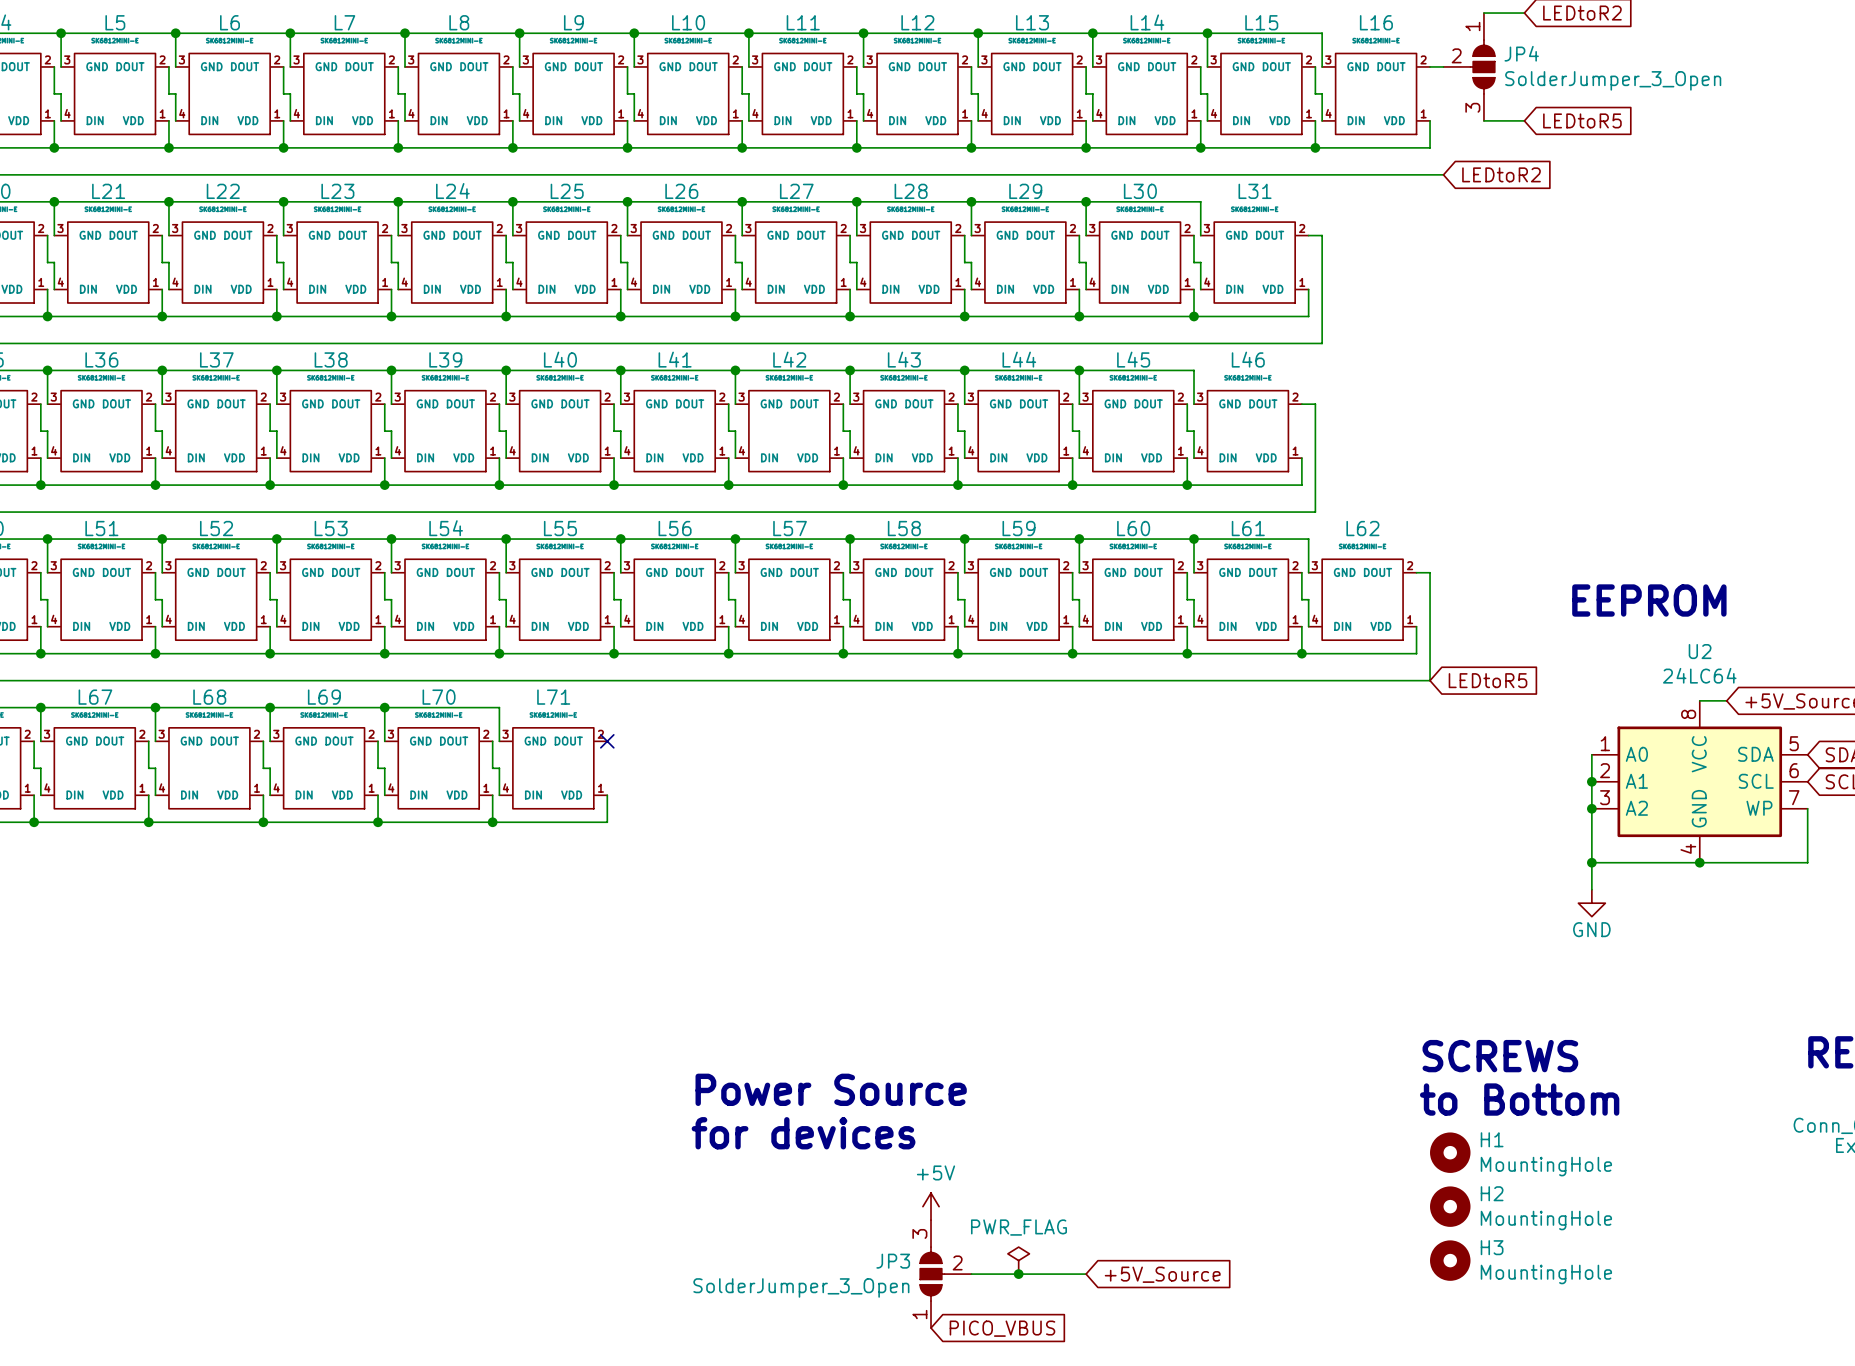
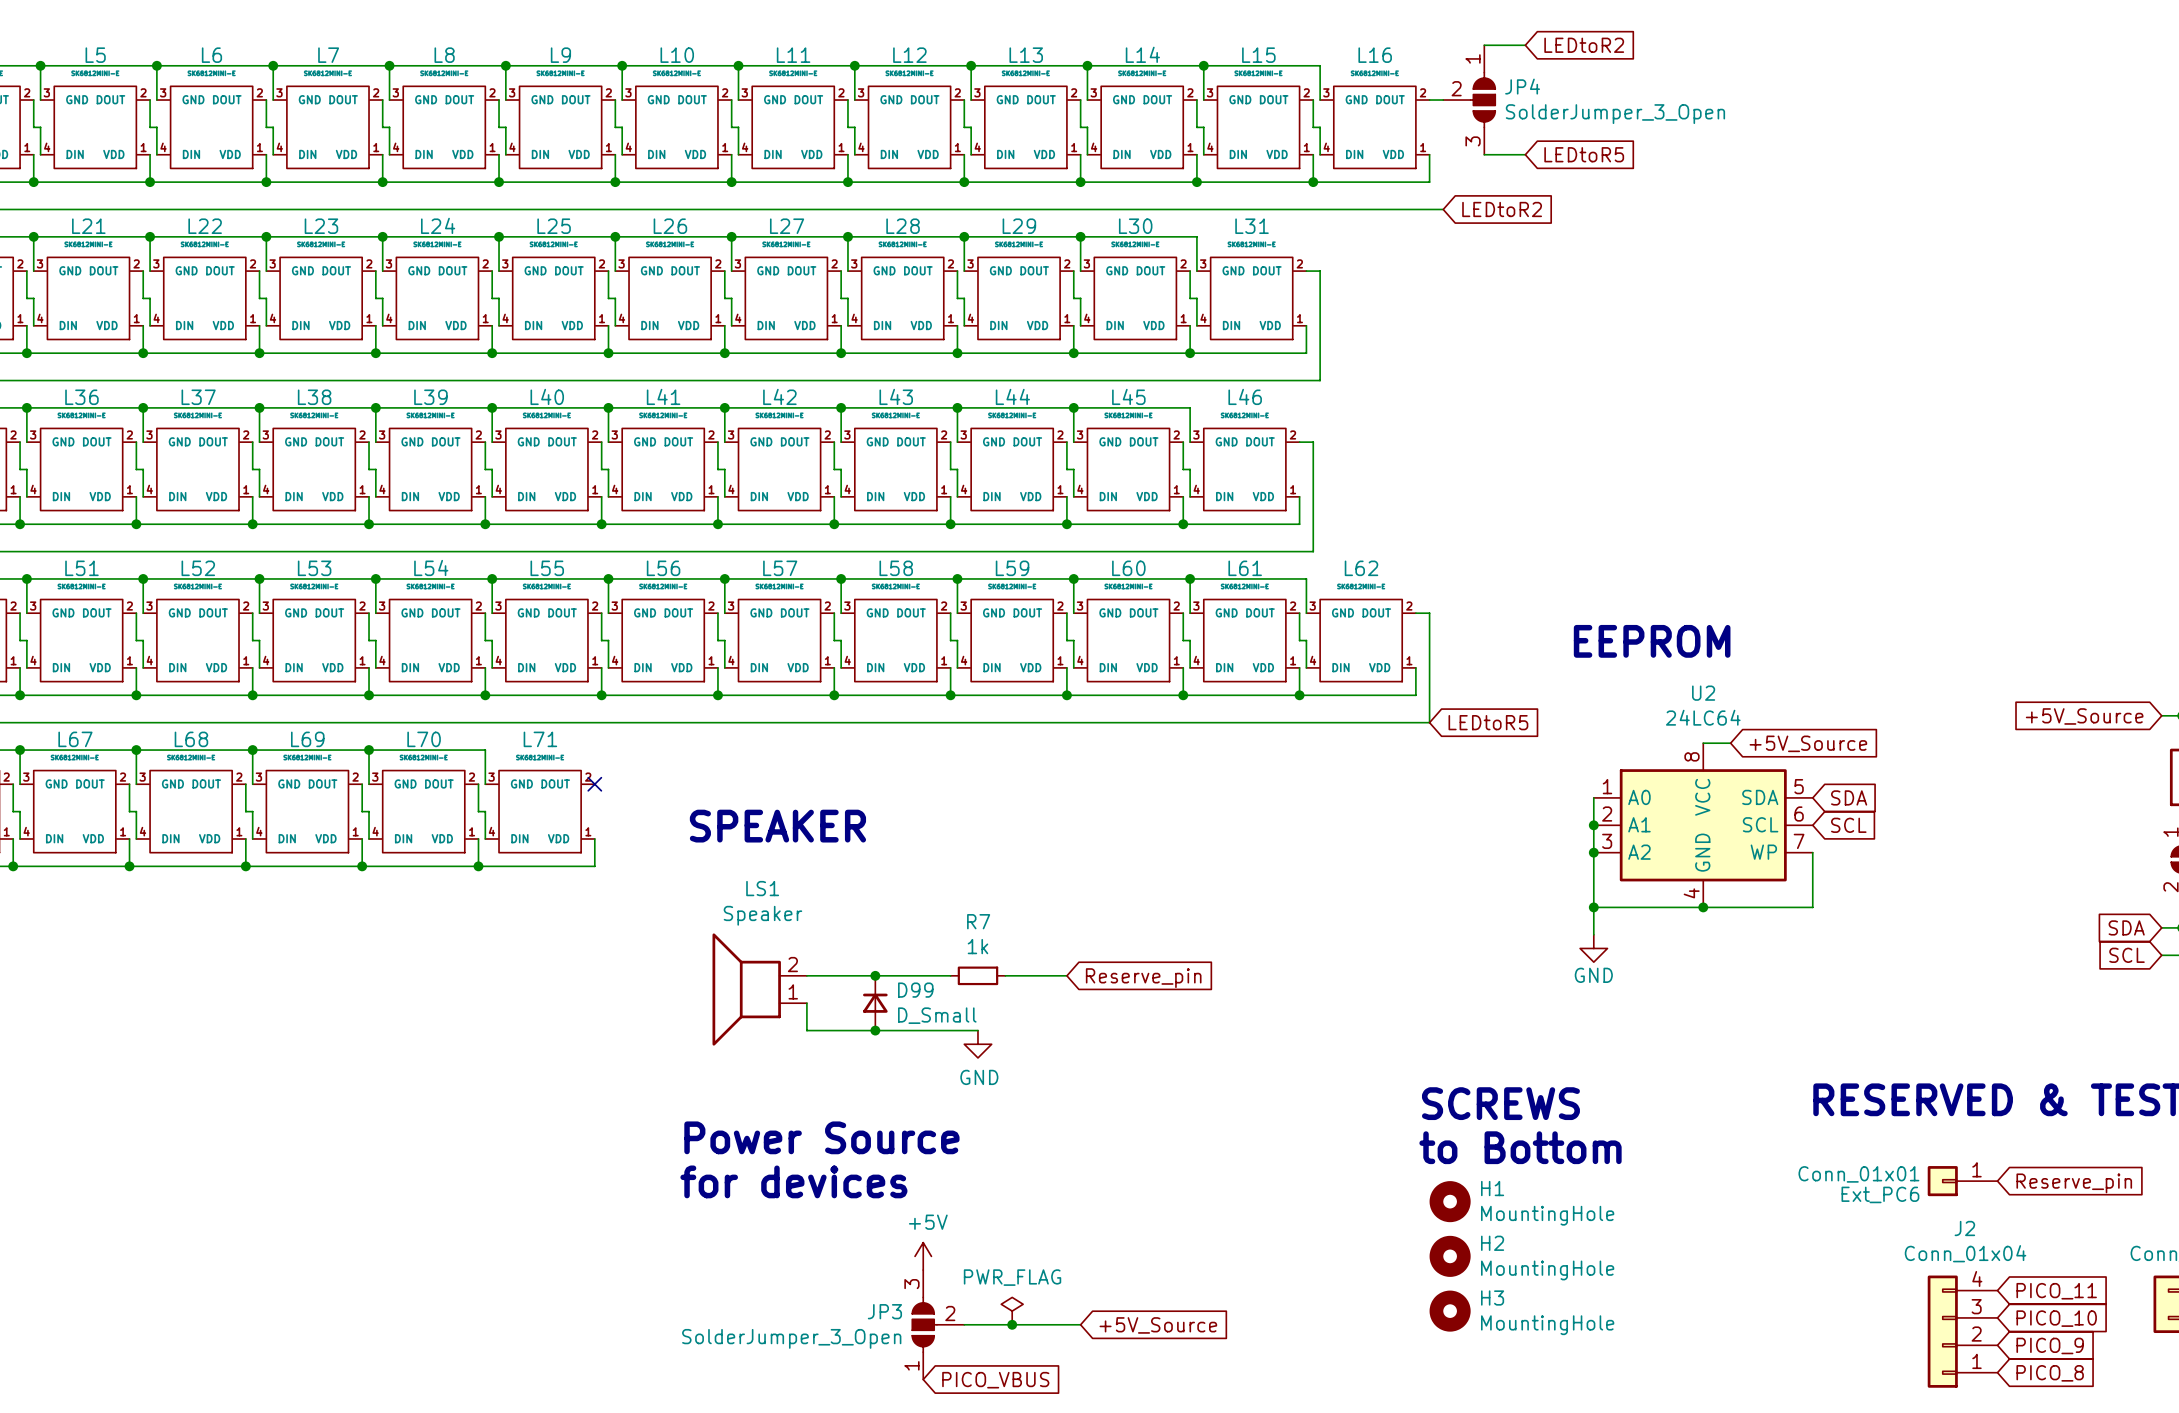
text: none -> SPEAKER (777, 826)
wire: none -> (806, 975) (950, 975)
junction: none -> (875, 975)
R7: none -> 1k (977, 975)
wire: none -> (1005, 975) (1066, 975)
global label: none -> Reserve_pin (1143, 978)
LS1: none -> Speaker (759, 989)
wire: none -> (806, 1003) (806, 1030) (977, 1030)
D99: none -> D_Small (875, 1003)
junction: none -> (875, 1030)
power symbol: none -> GND (977, 1044)

